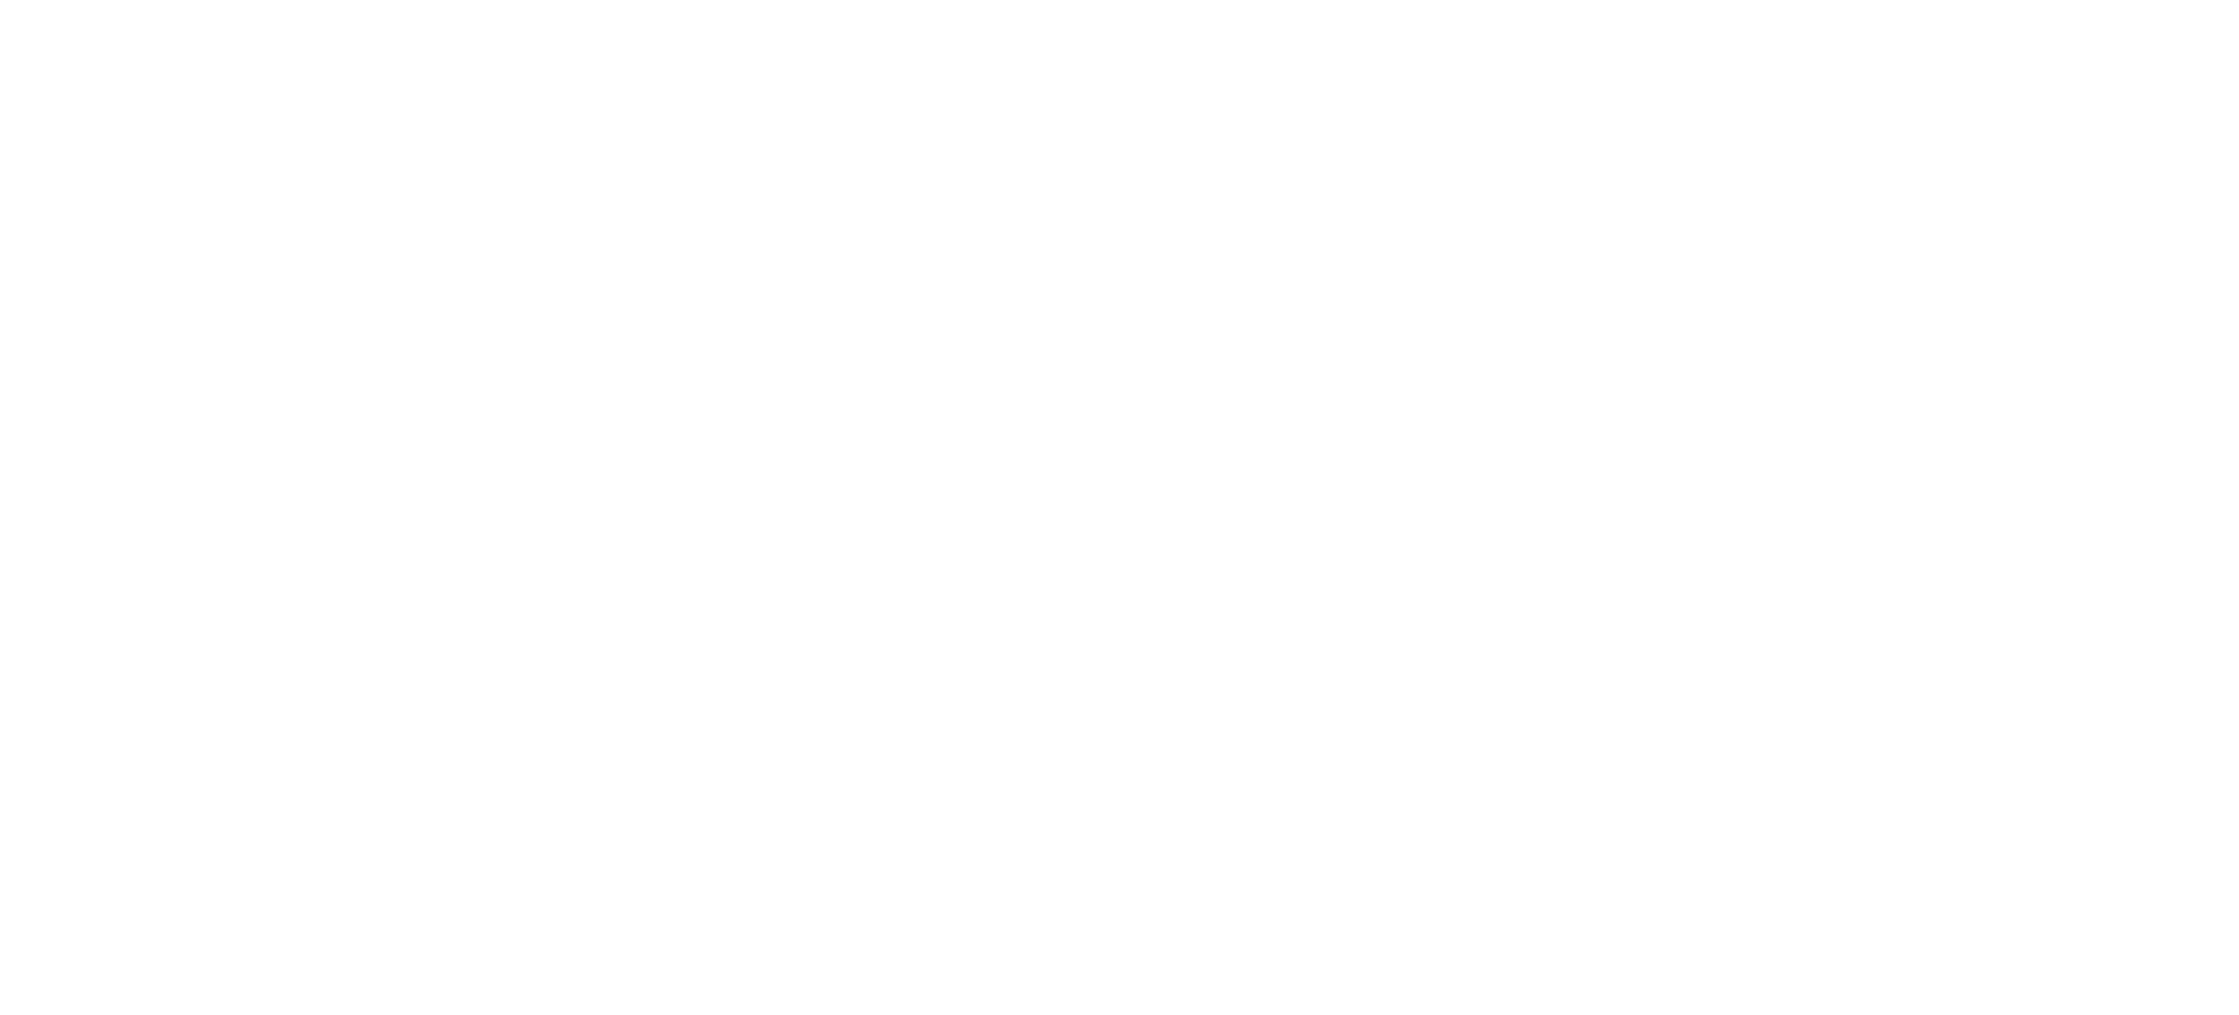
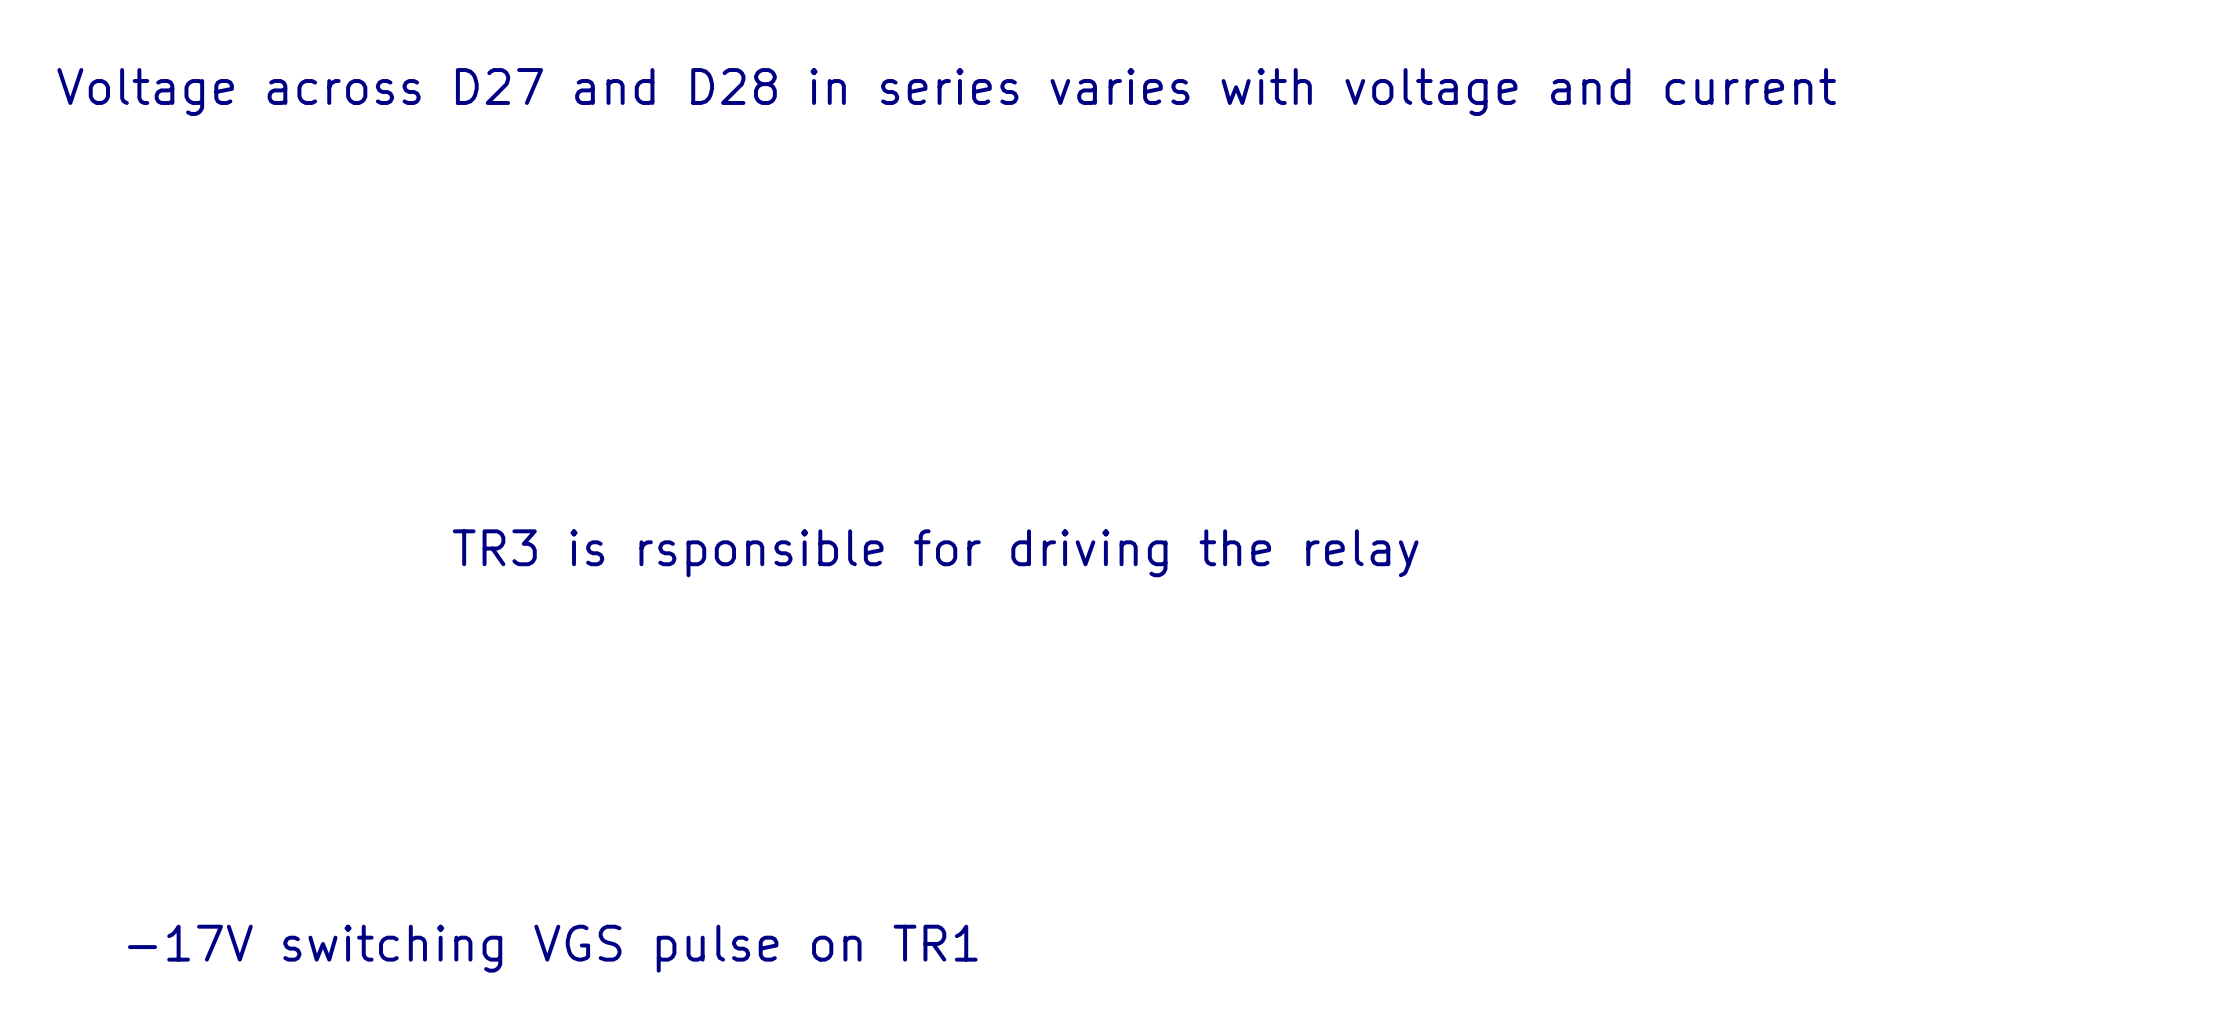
text: none -> Voltage across D27 and D28 in series varies with voltage and current (946, 91)
text: none -> TR3 is rsponsible for driving the relay (935, 553)
text: none -> -17V switching VGS pulse on TR1 (552, 948)

